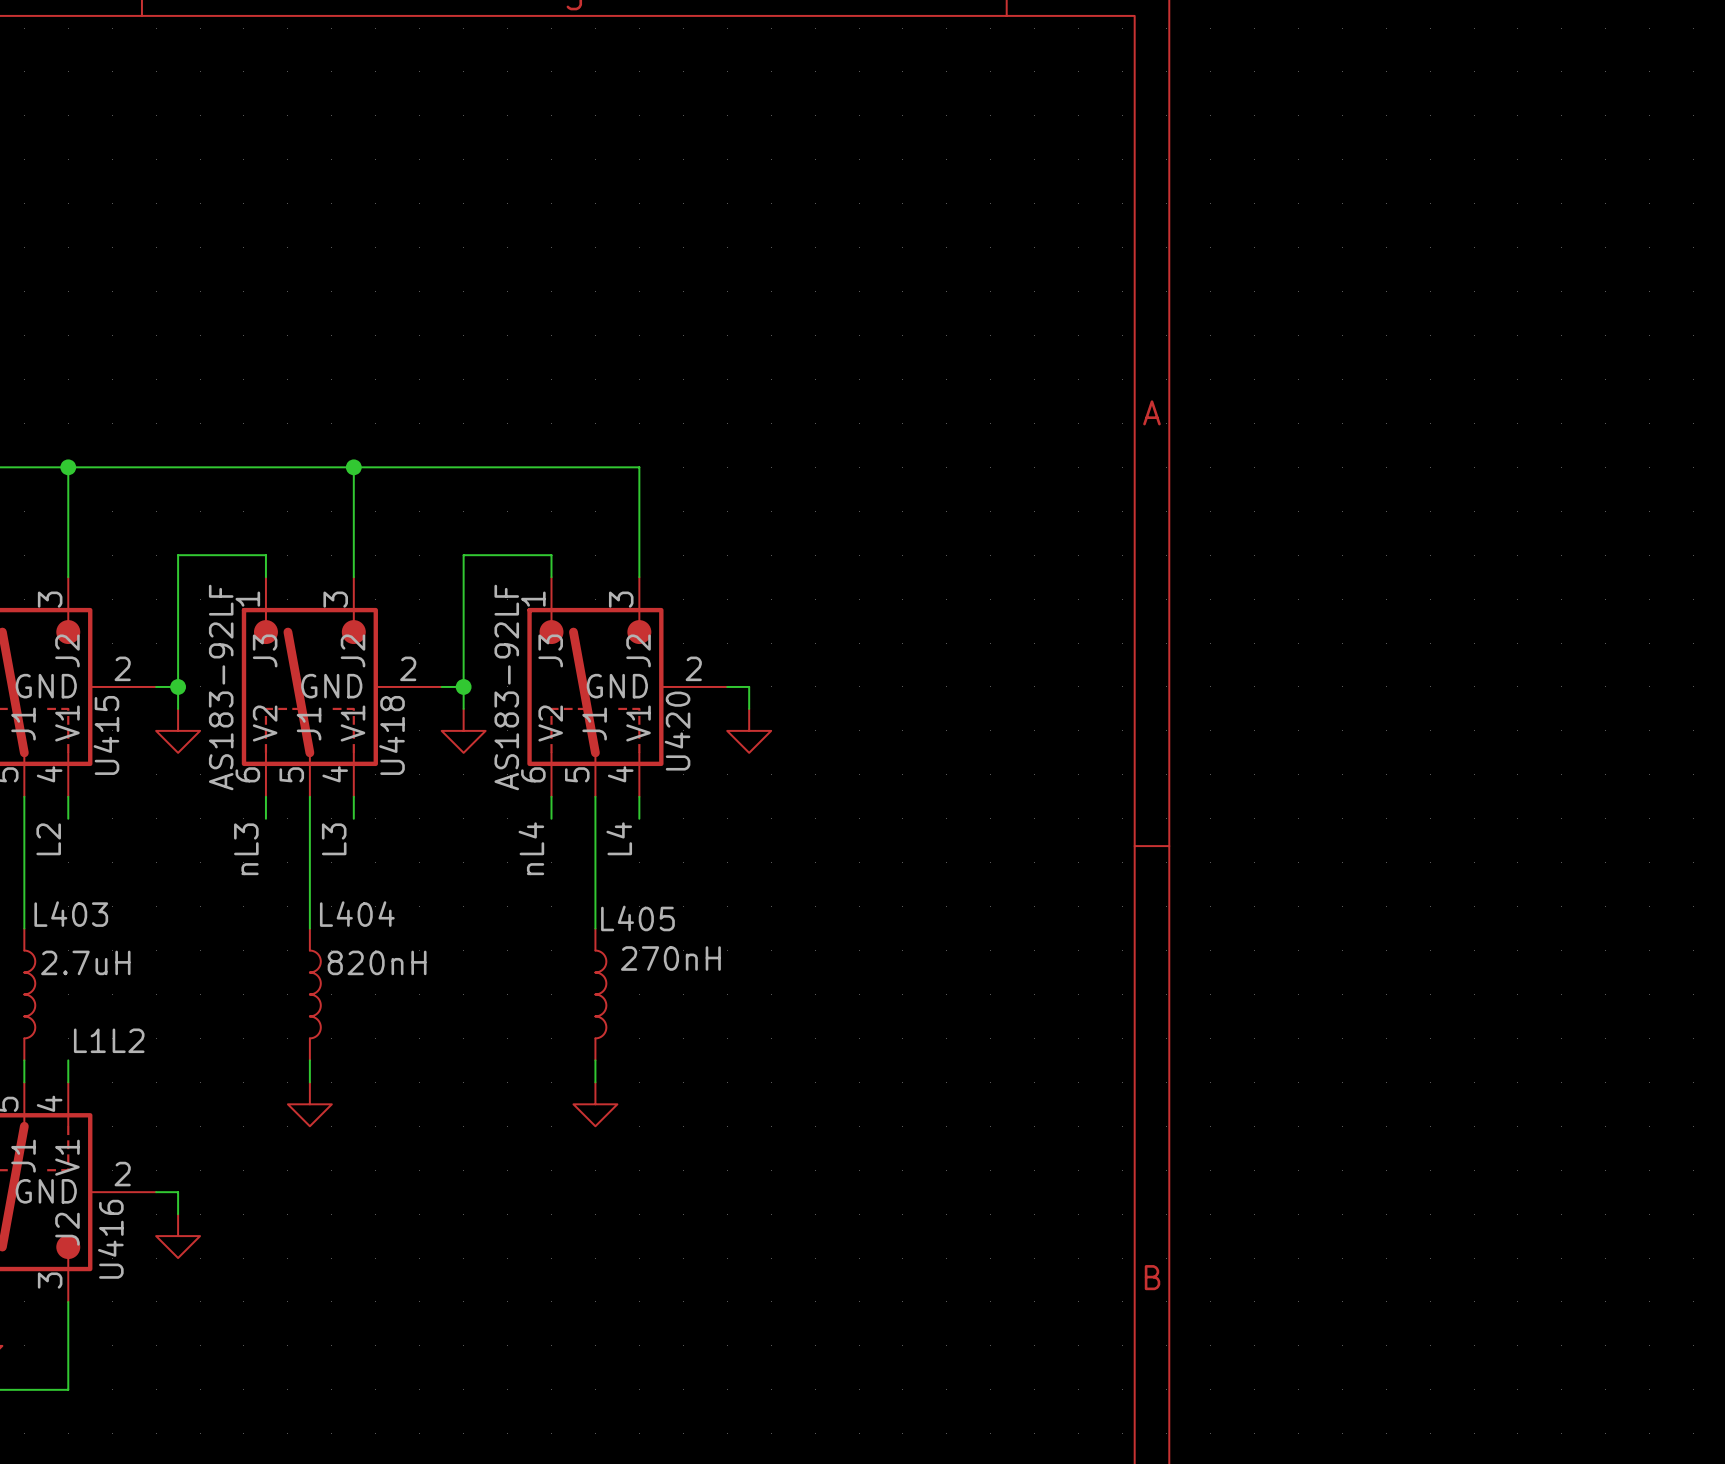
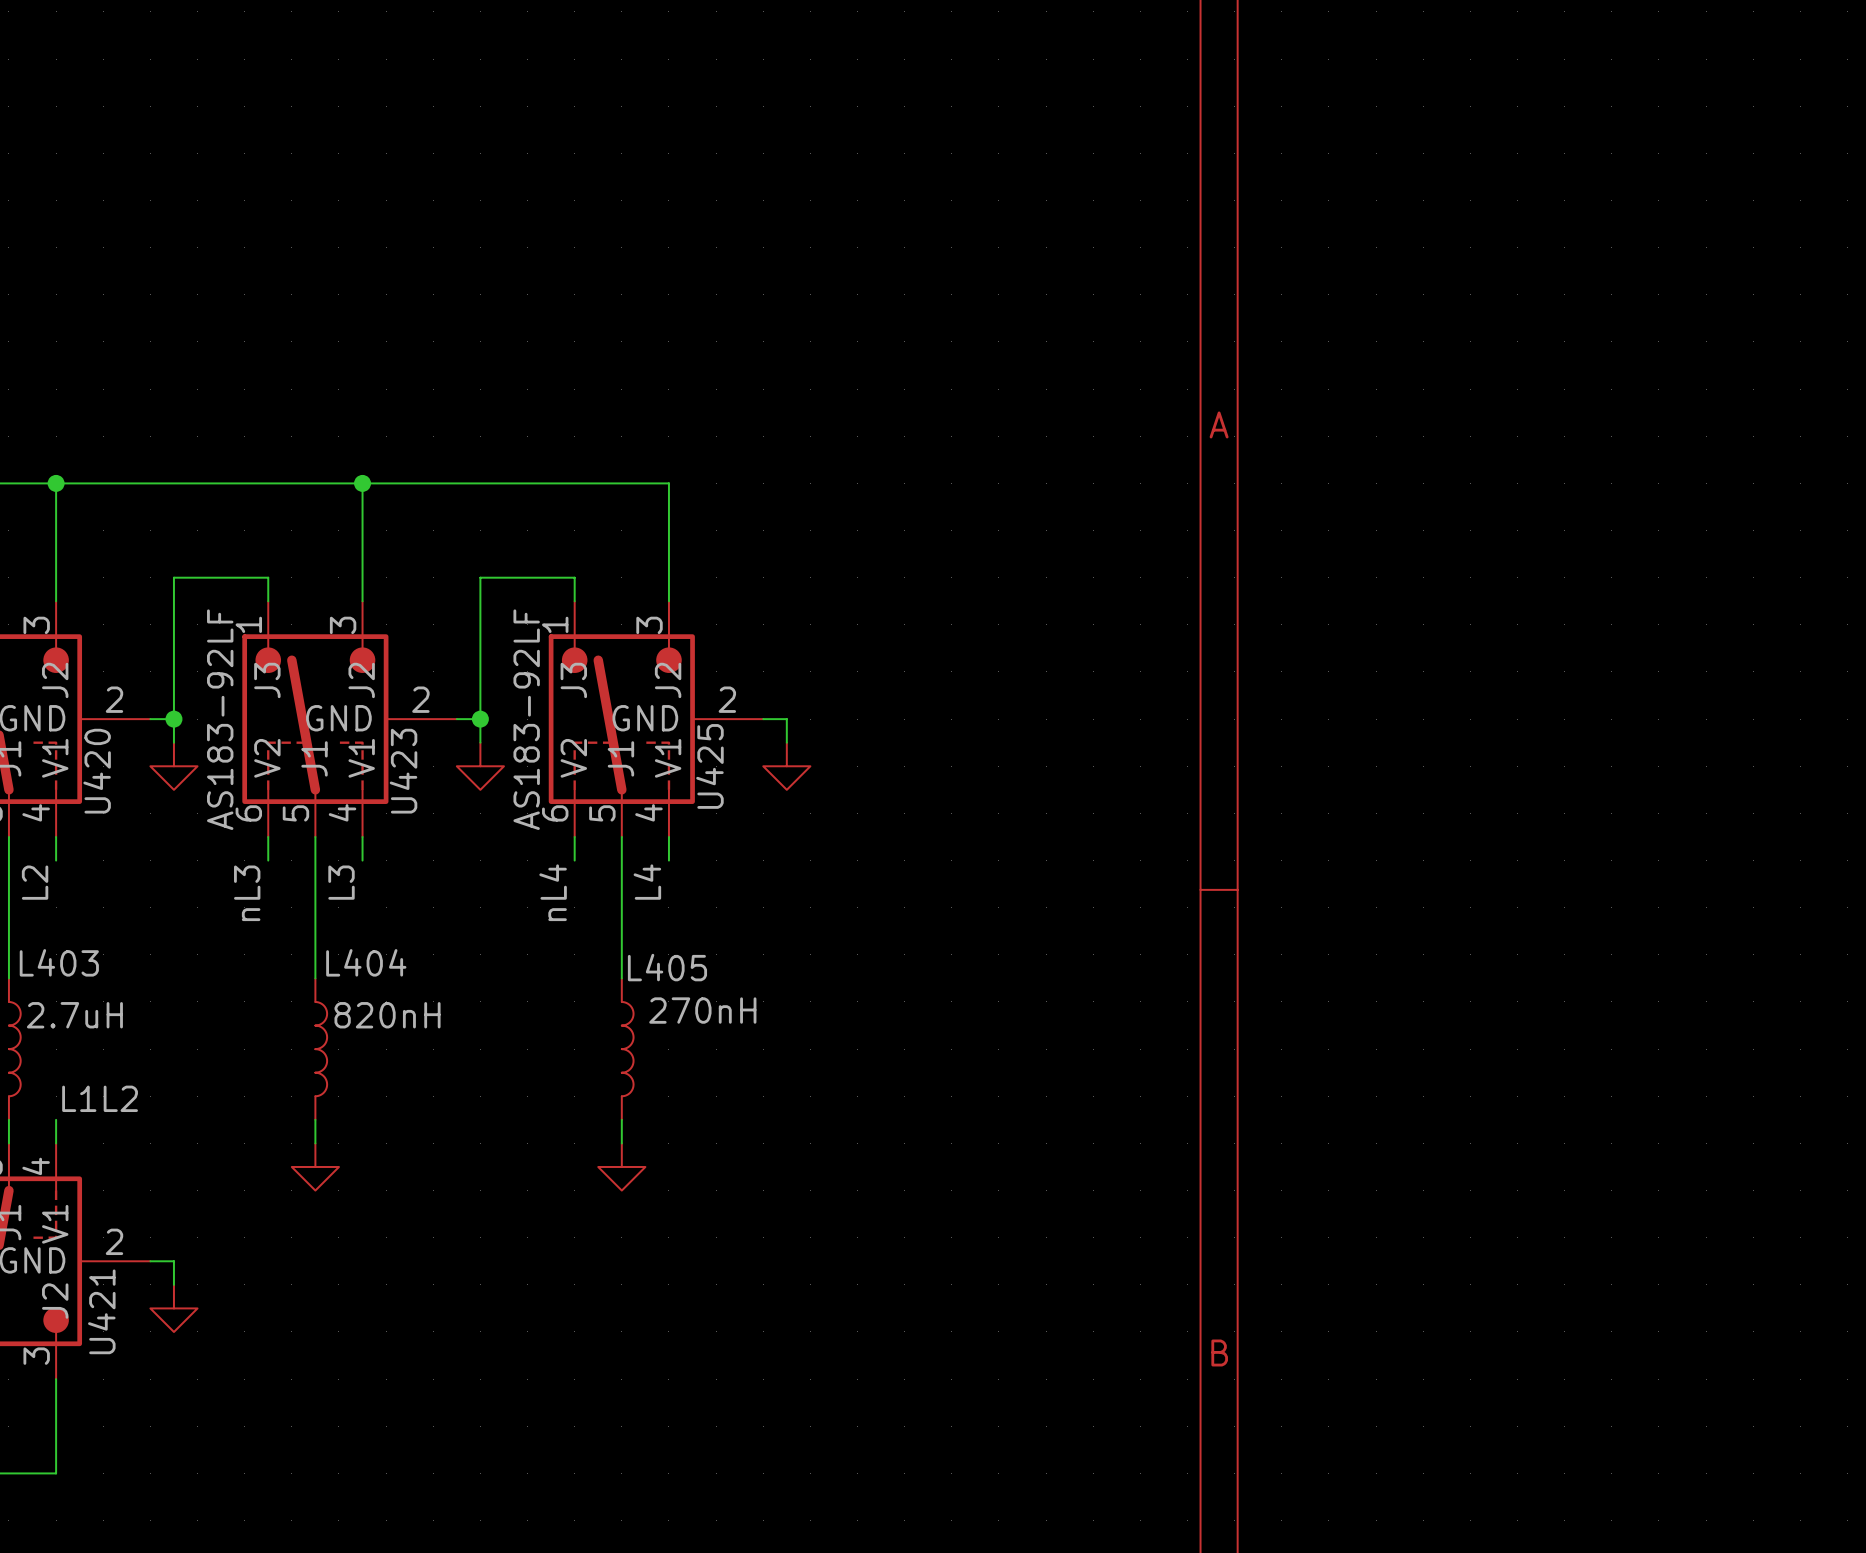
U420 name: U420 (677, 731) -> U425 (709, 766)
U415 name: U415 (106, 735) -> U420 (97, 771)
U418 name: U418 (392, 735) -> U423 (403, 771)
U416 name: U416 (110, 1239) -> U421 (101, 1311)

